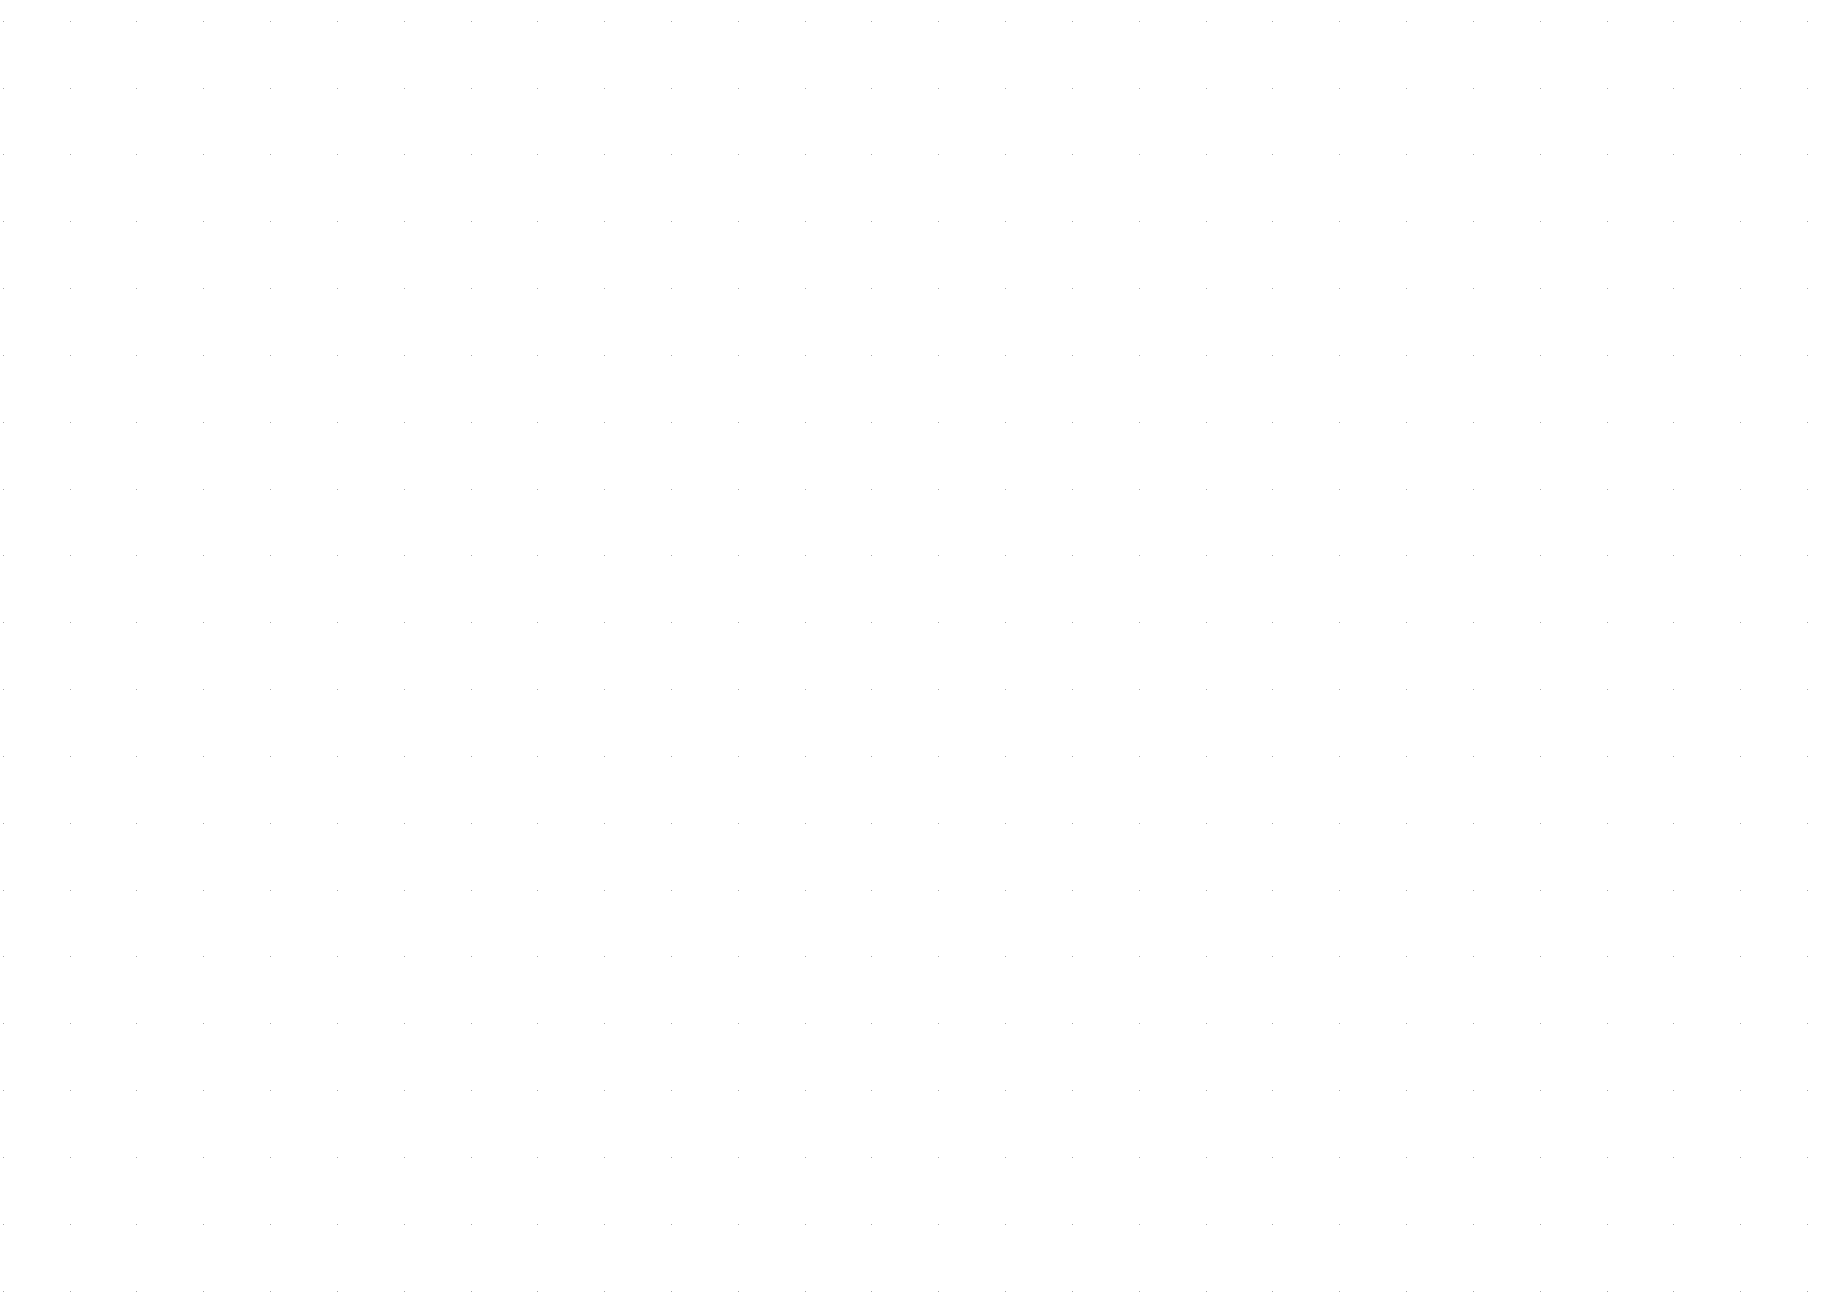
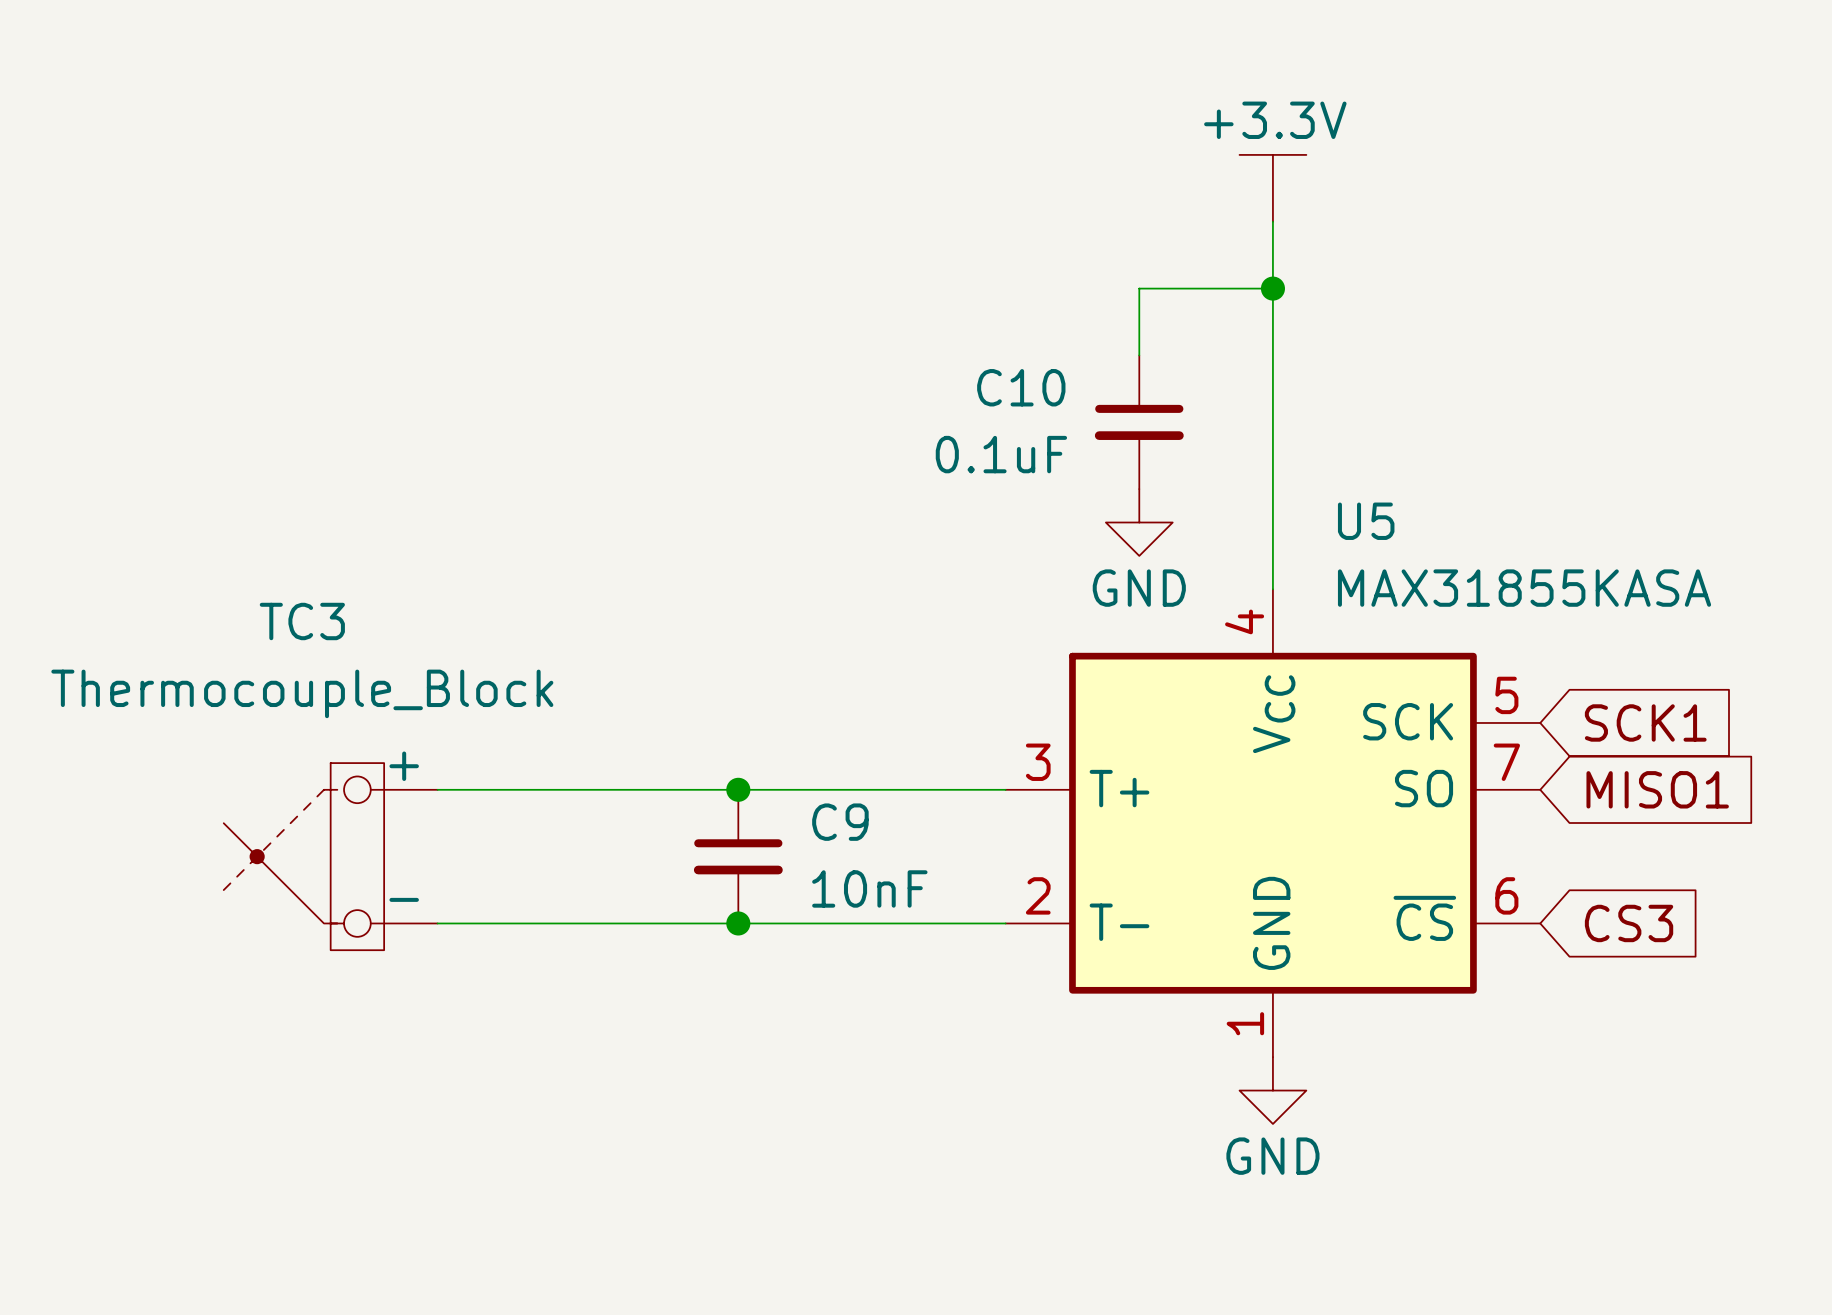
power symbol: none -> +3.3V (1272, 188)
wire: none -> (1272, 221) (1272, 589)
wire: none -> (1272, 288) (1139, 288) (1139, 355)
junction: none -> (1272, 288)
C10: none -> 0.1uF (1139, 422)
power symbol: none -> GND (1139, 522)
global label: none -> SCK1 (1645, 722)
wire: none -> (437, 789) (1005, 789)
junction: none -> (738, 789)
global label: none -> MISO1 (1657, 789)
U5: none -> MAX31855KASA (1272, 823)
TC3: none -> Thermocouple_Block (330, 856)
C9: none -> 10nF (738, 856)
wire: none -> (437, 923) (1005, 923)
junction: none -> (738, 923)
global label: none -> CS3 (1629, 923)
power symbol: none -> GND (1272, 1090)

